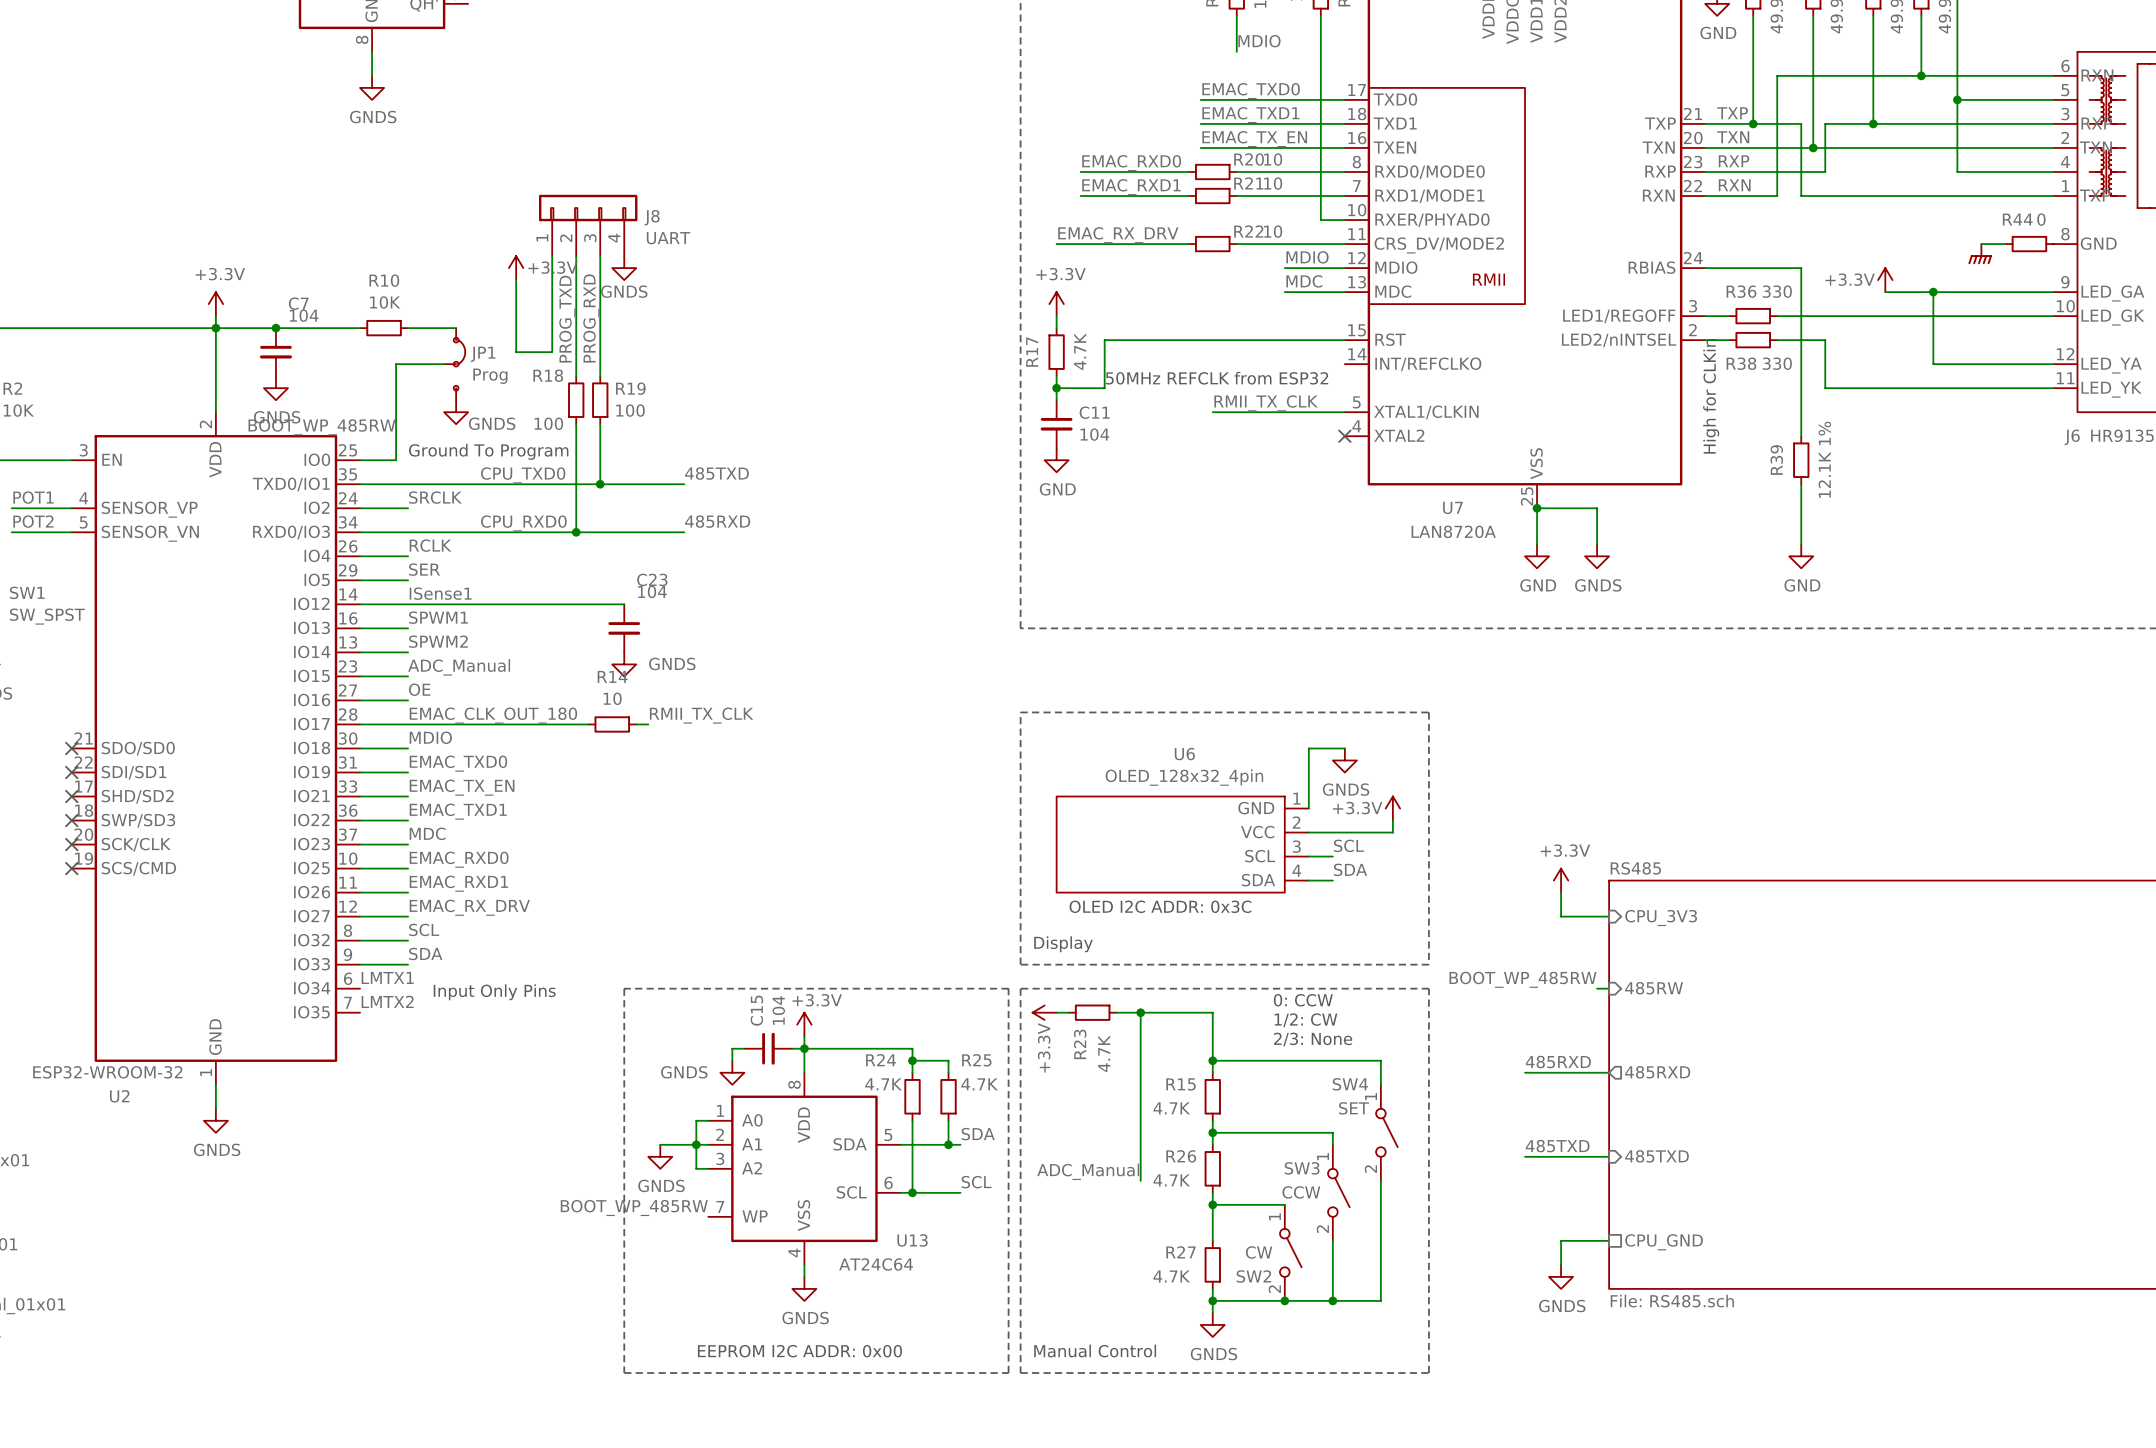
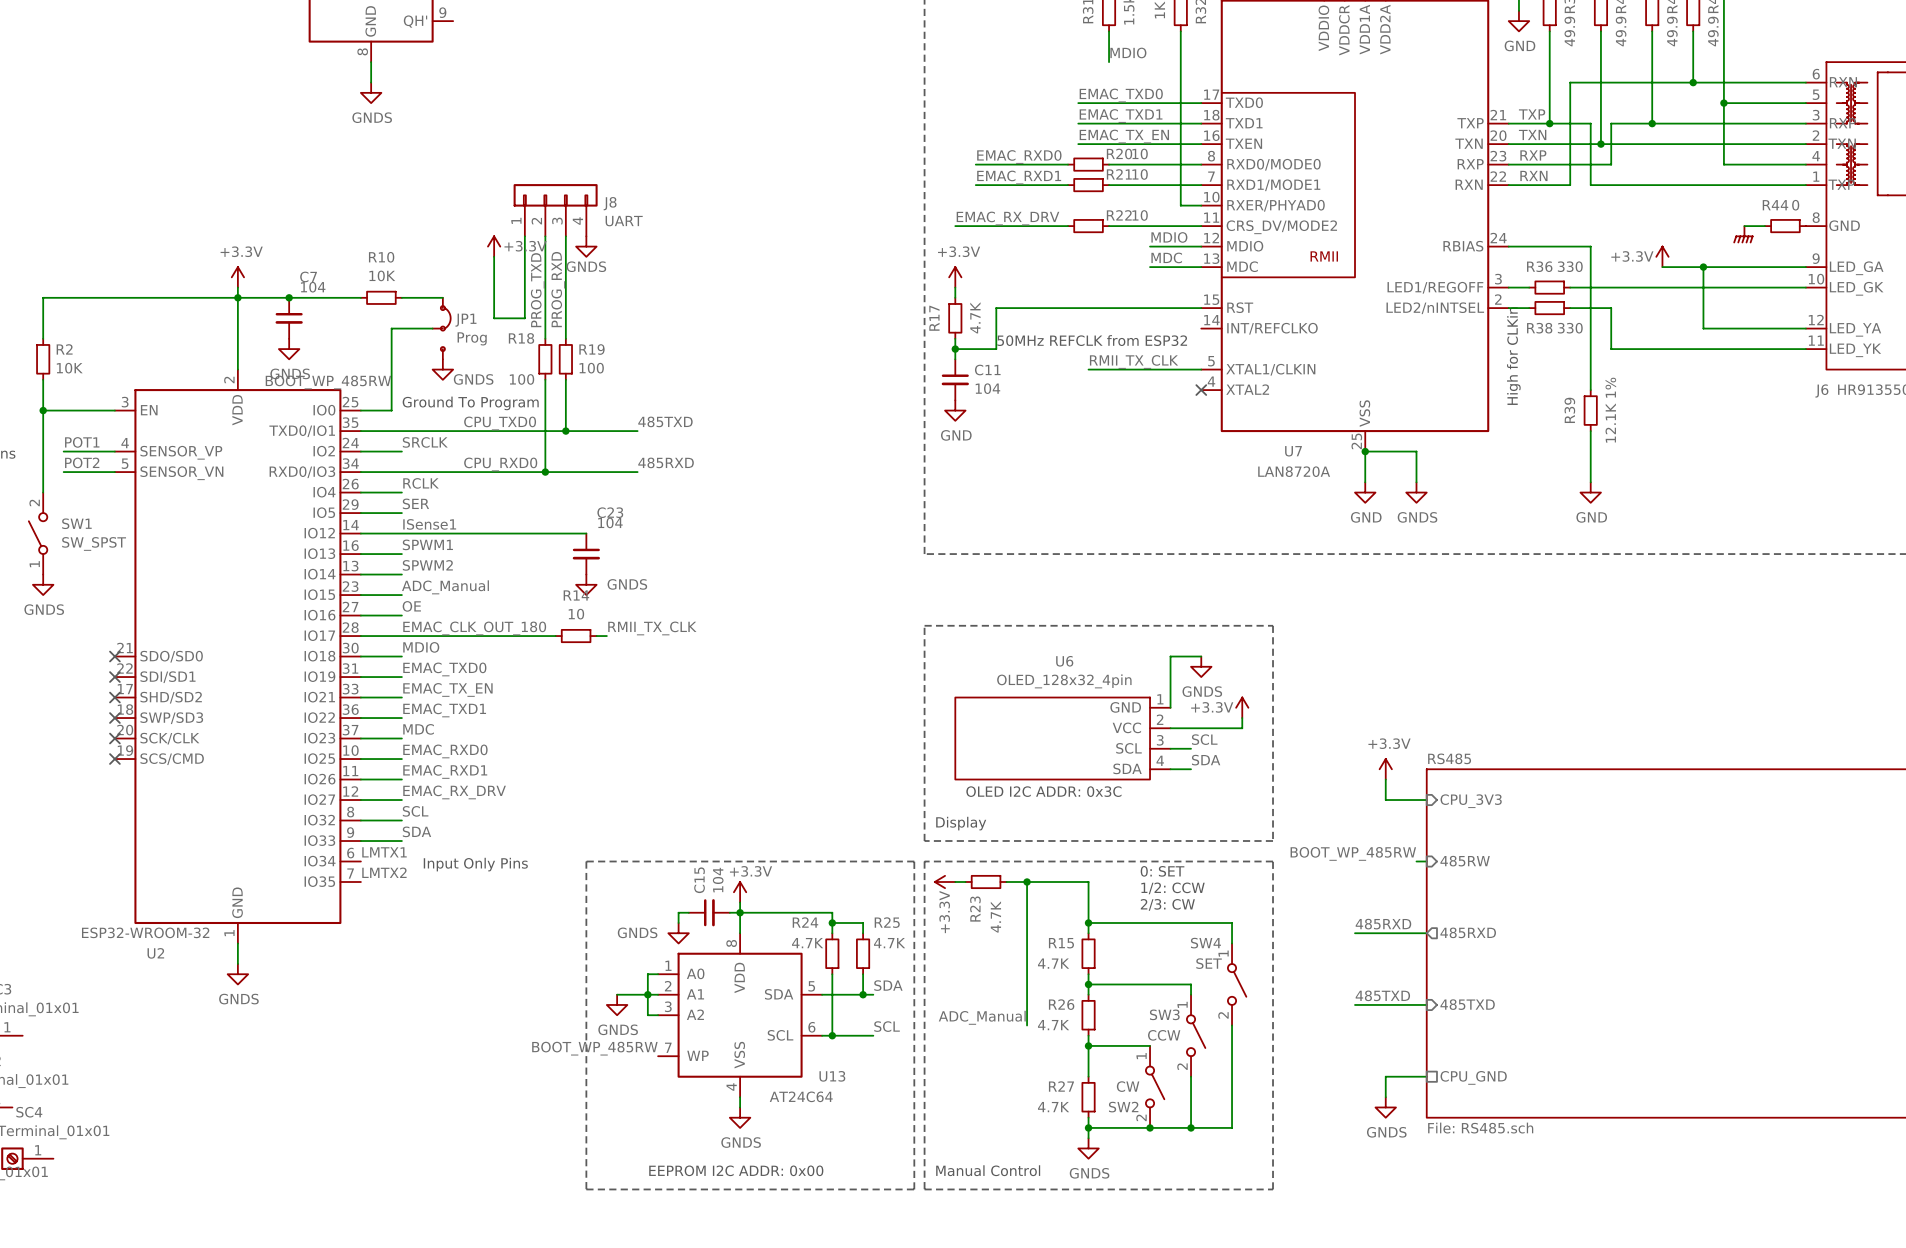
text: 0: CCW (1303, 1000) -> 0: SET (1162, 871)
text: 1/2: CW (1305, 1020) -> 1/2: CCW (1173, 888)
text: 2/3: None (1313, 1039) -> 2/3: CW (1167, 904)

